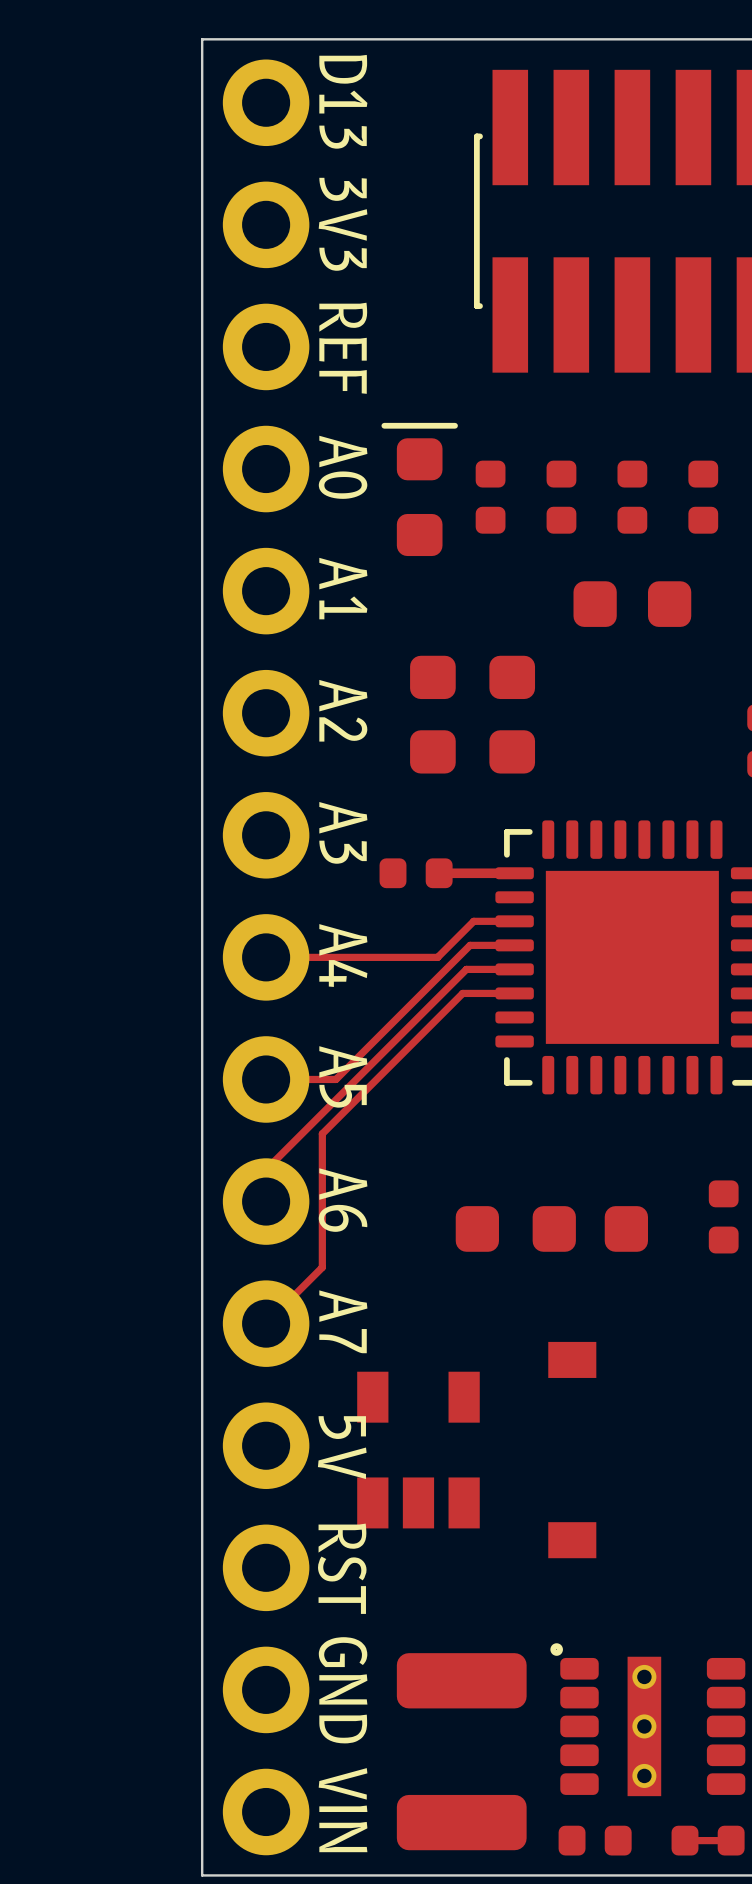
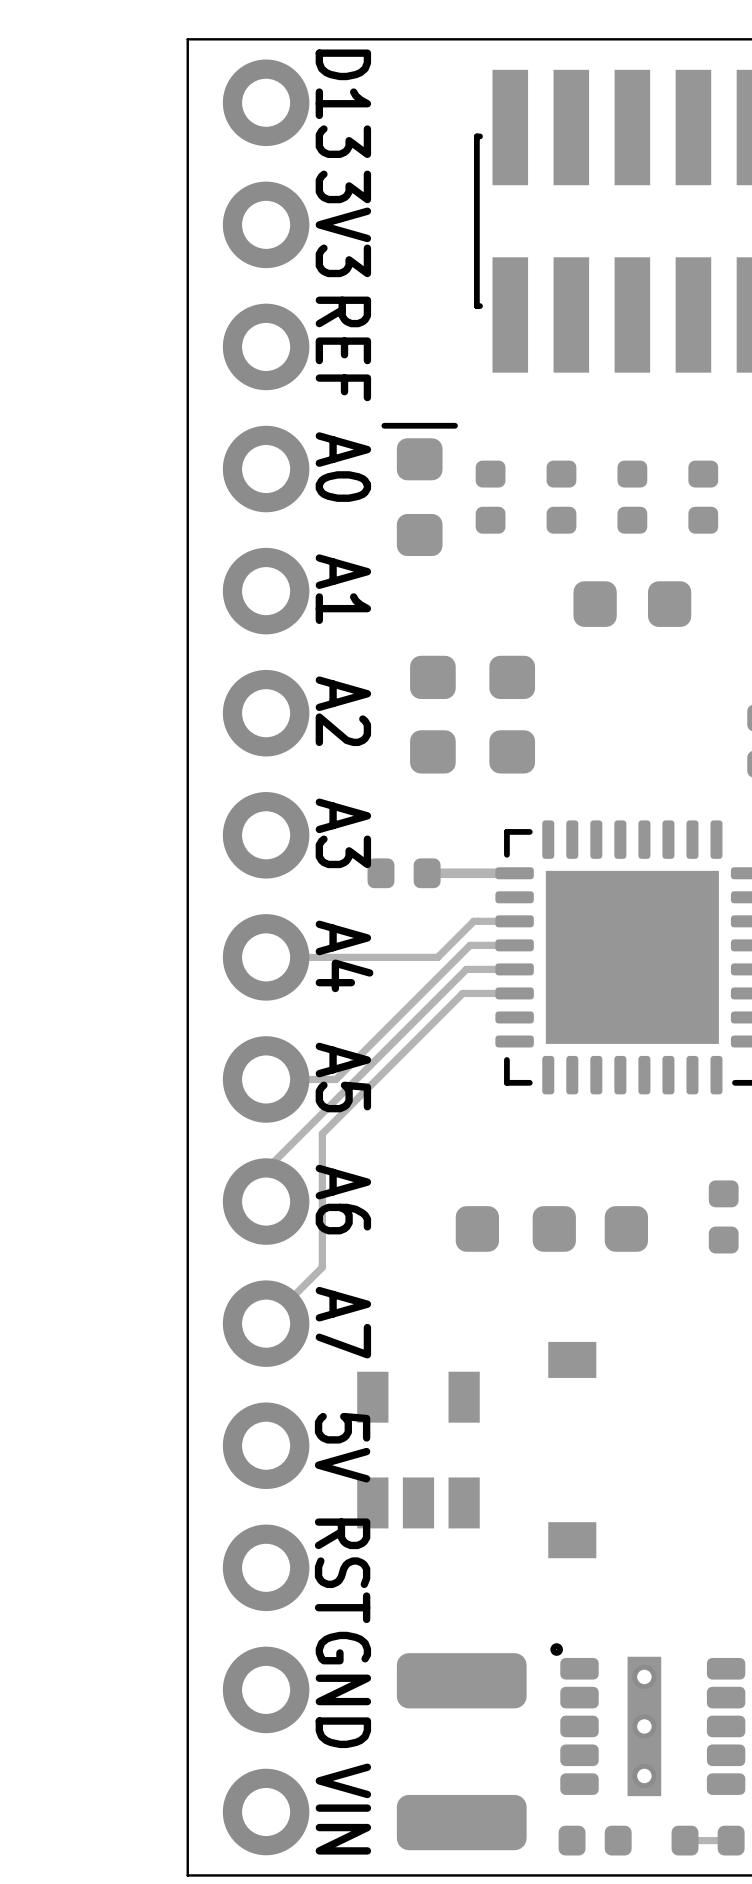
board edge: (202, 39) (202, 1875) -> (202, 39) (187, 39) (187, 1875) (202, 1875)
part position: (416, 873) -> (404, 873)

